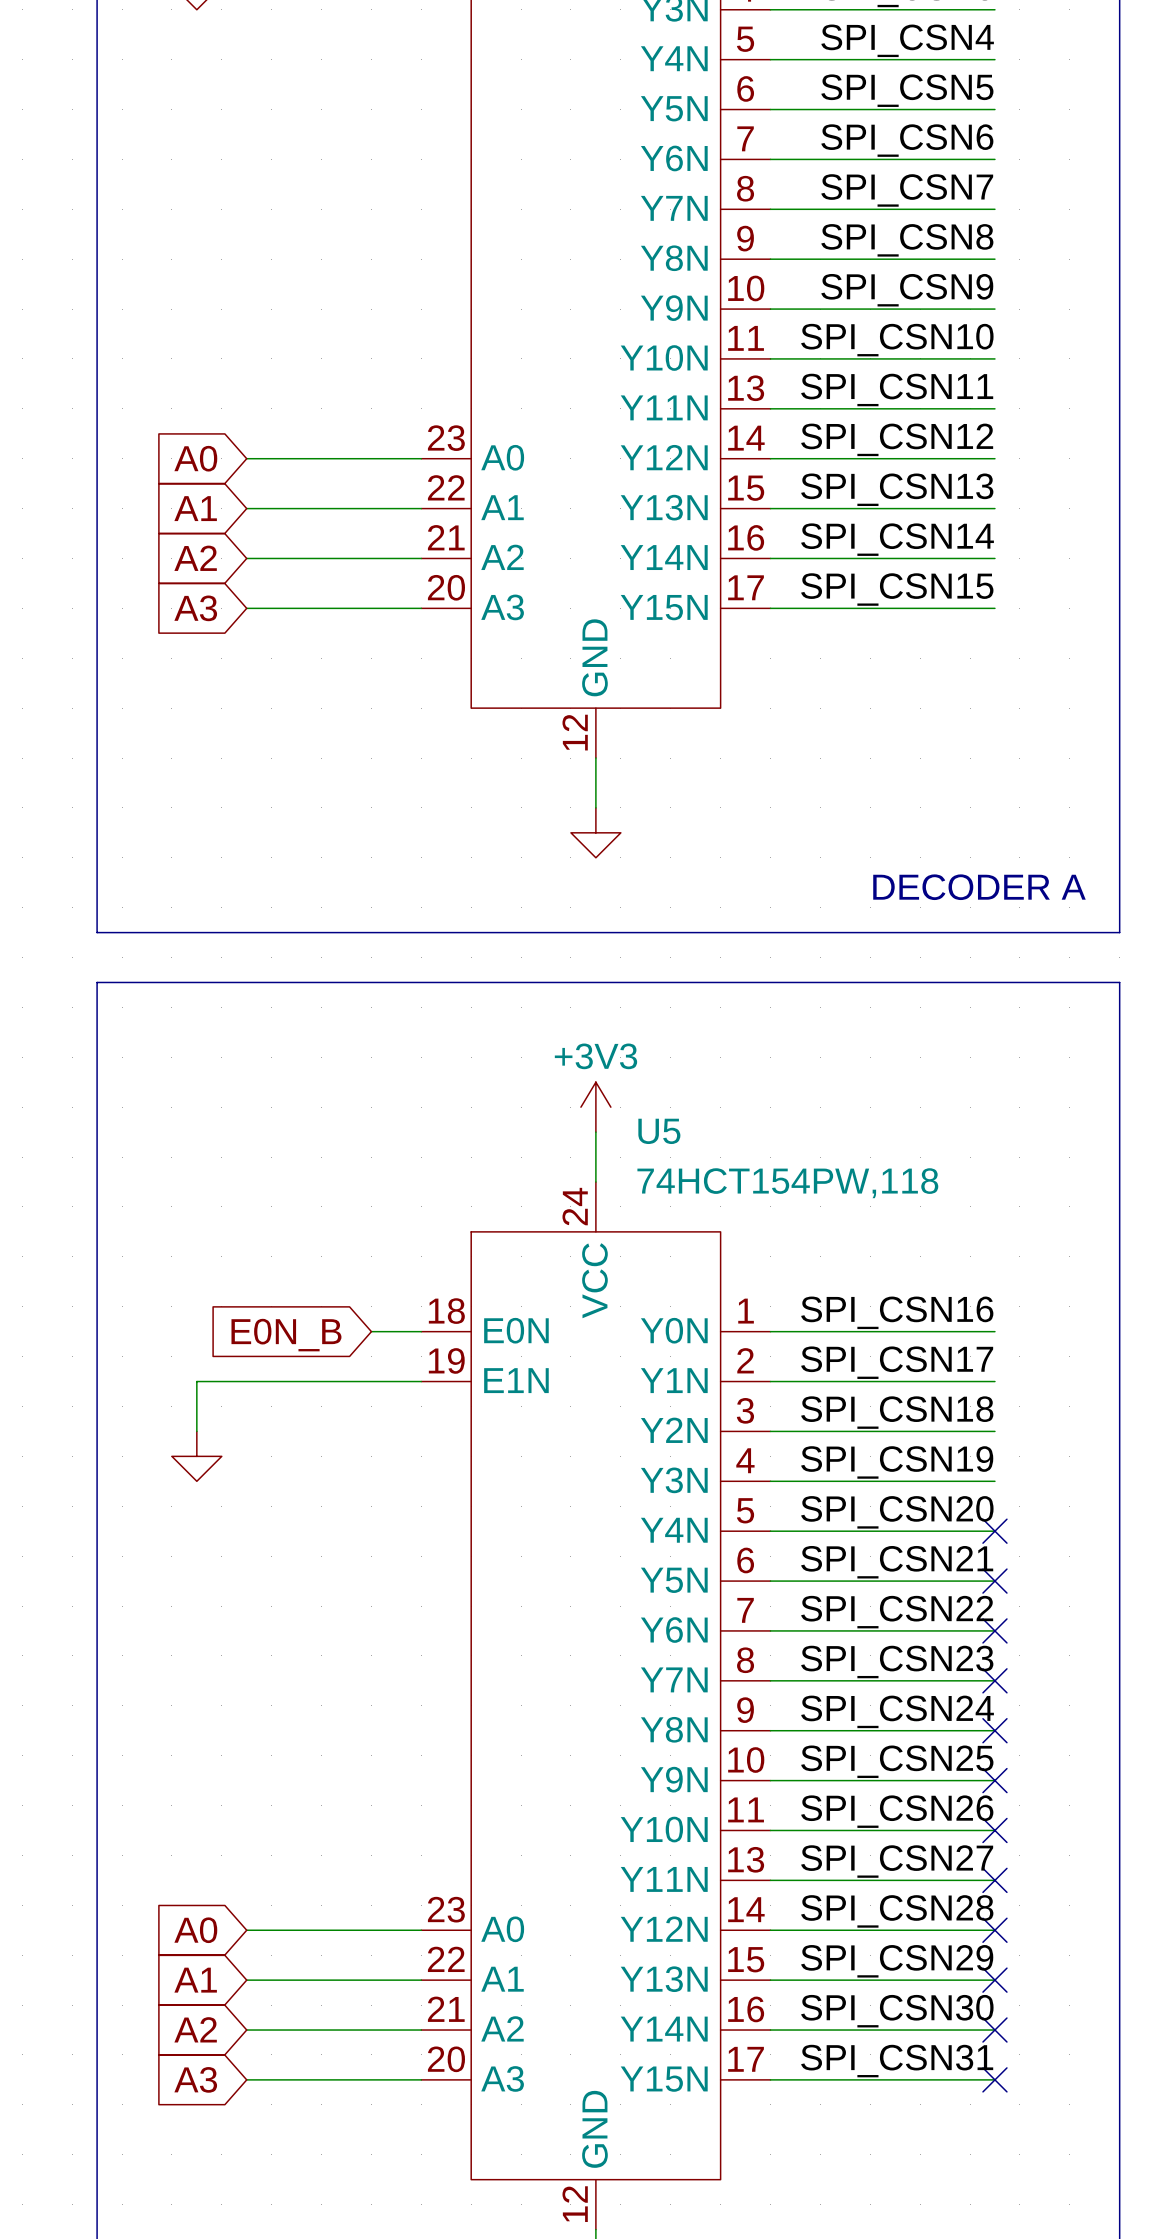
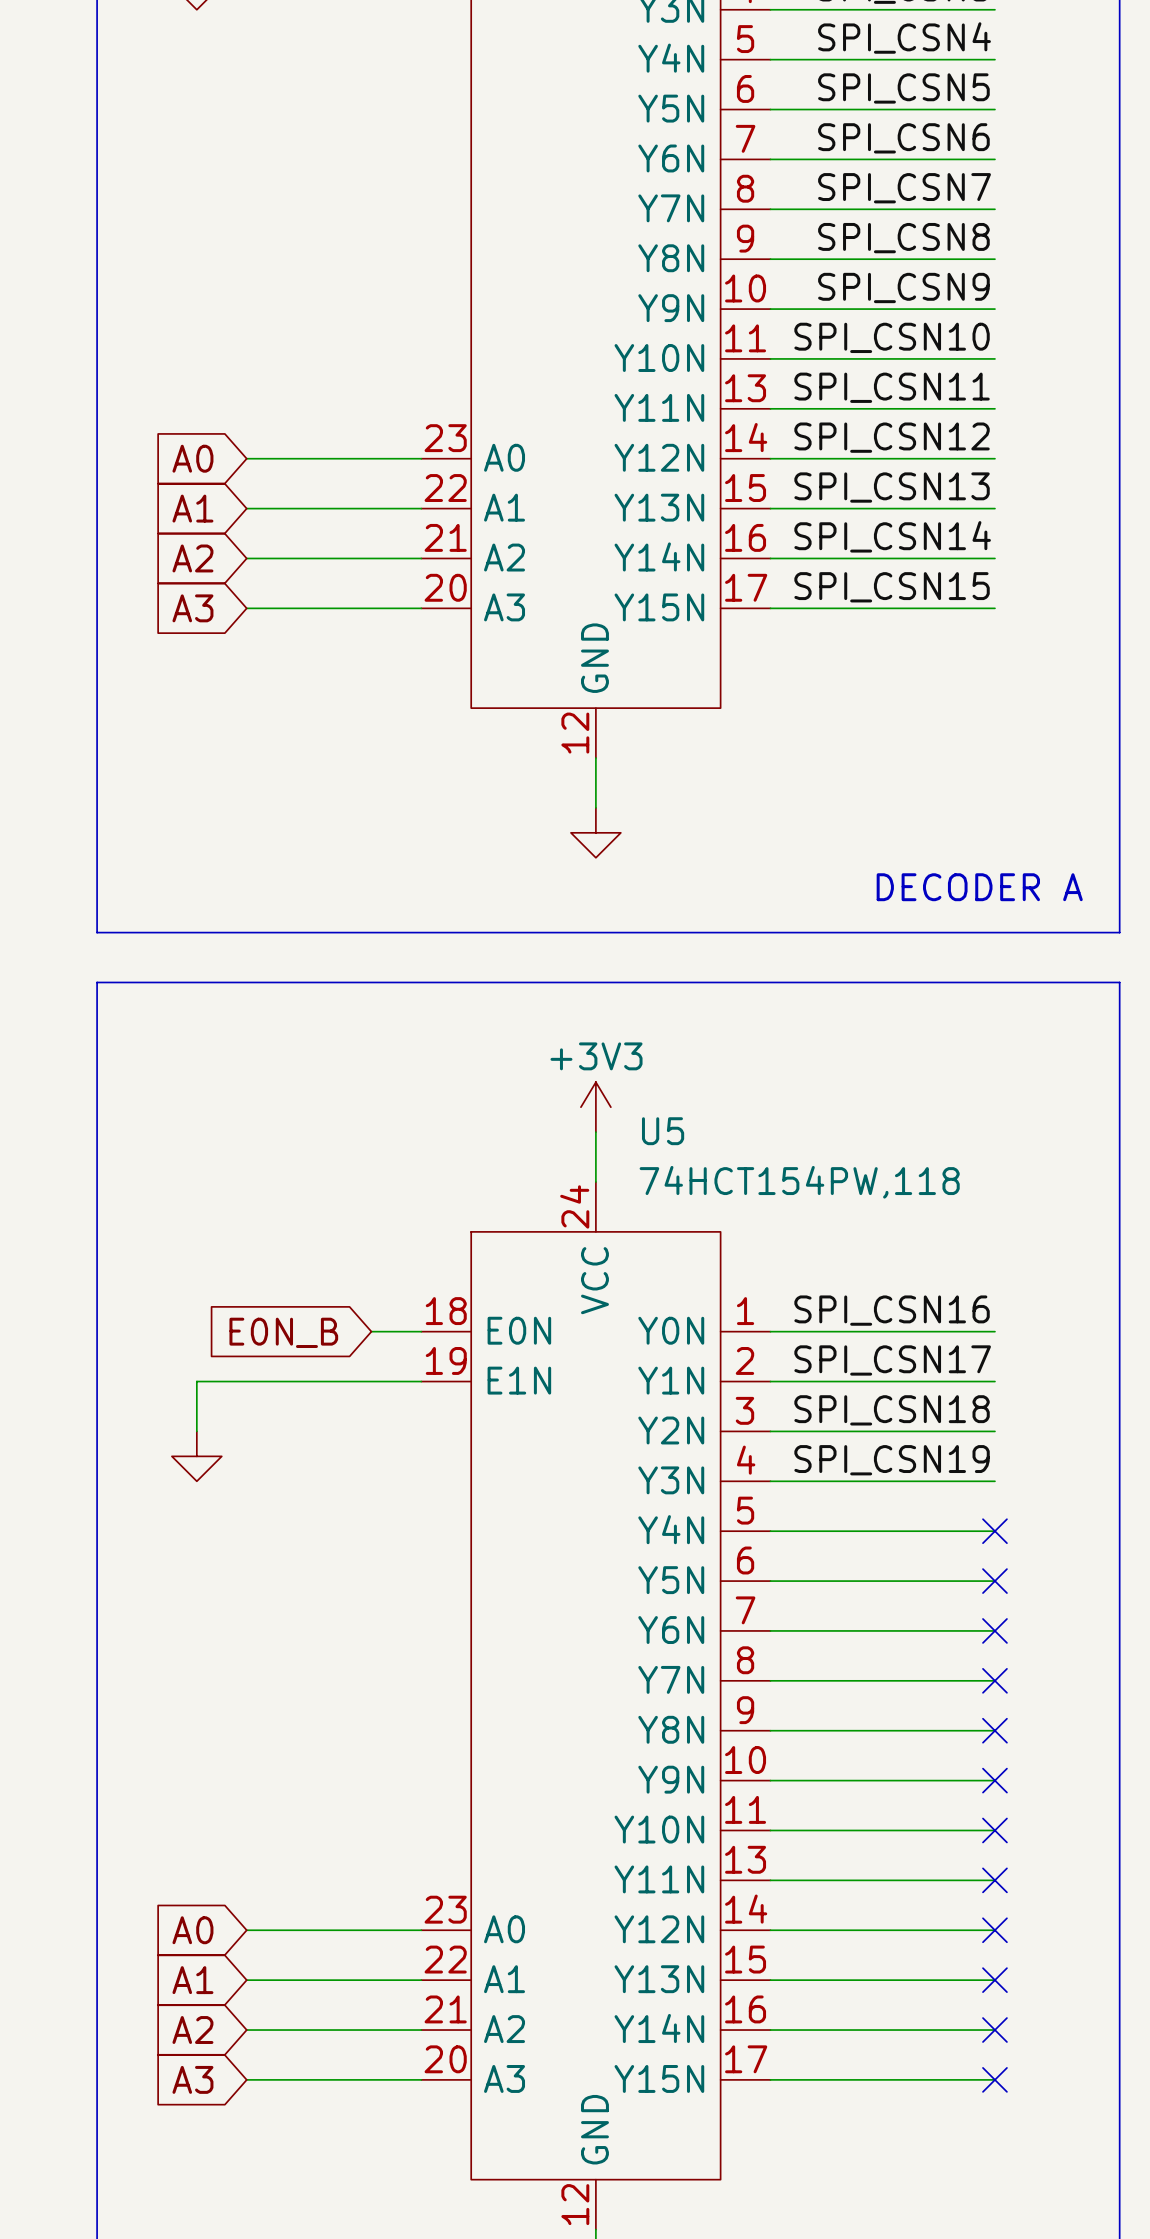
label: SPI_CSN20 (897, 1512) -> none
label: SPI_CSN21 (897, 1562) -> none
label: SPI_CSN22 (897, 1612) -> none
label: SPI_CSN23 (897, 1661) -> none
label: SPI_CSN24 (897, 1711) -> none
label: SPI_CSN25 (897, 1761) -> none
label: SPI_CSN26 (897, 1811) -> none
label: SPI_CSN27 (897, 1861) -> none
label: SPI_CSN28 (897, 1911) -> none
label: SPI_CSN29 (897, 1961) -> none
label: SPI_CSN30 (897, 2011) -> none
label: SPI_CSN31 (897, 2061) -> none

